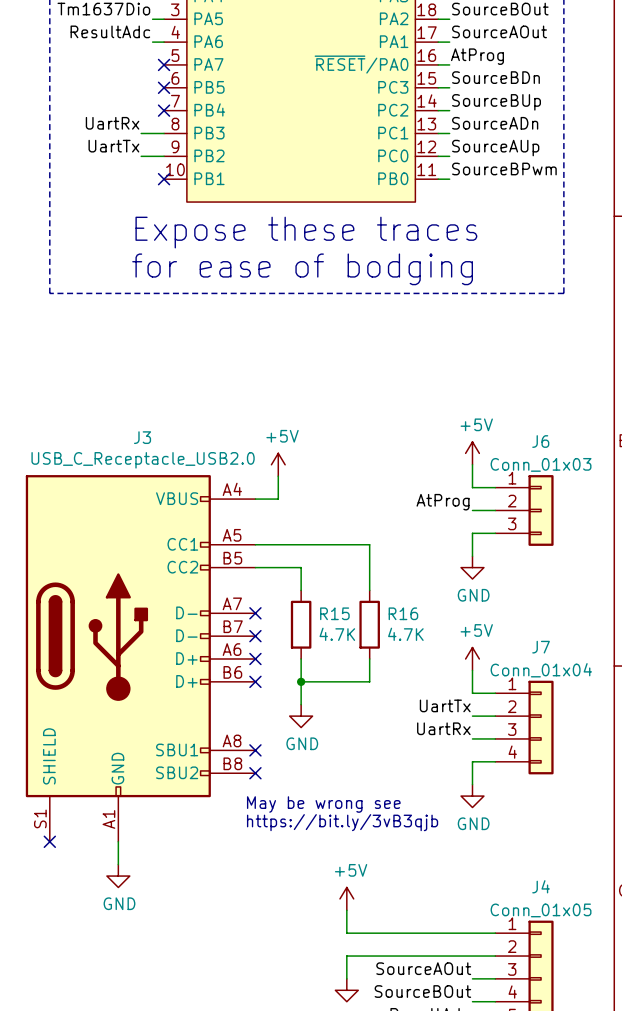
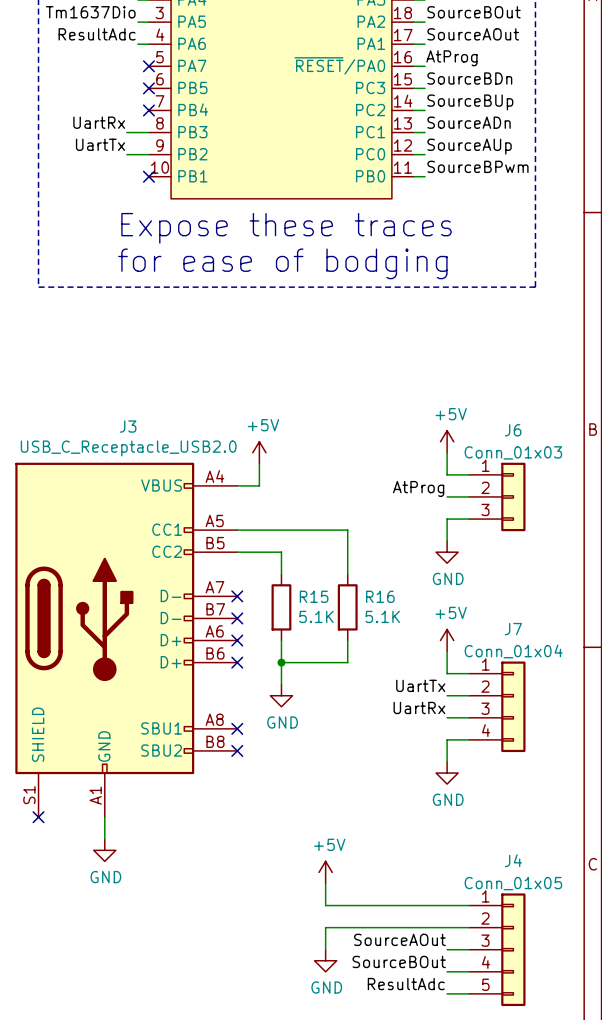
R15 value: 4.7K (337, 634) -> 5.1K (316, 616)
R16 value: 4.7K (405, 634) -> 5.1K (382, 616)
text: May be wrong see (323, 804) -> none
text: https://bit.ly/3vB3qjb (342, 822) -> none

